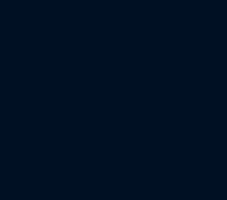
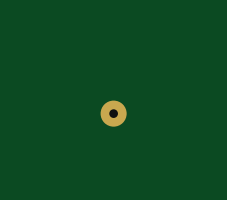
via: none -> (113, 113)

